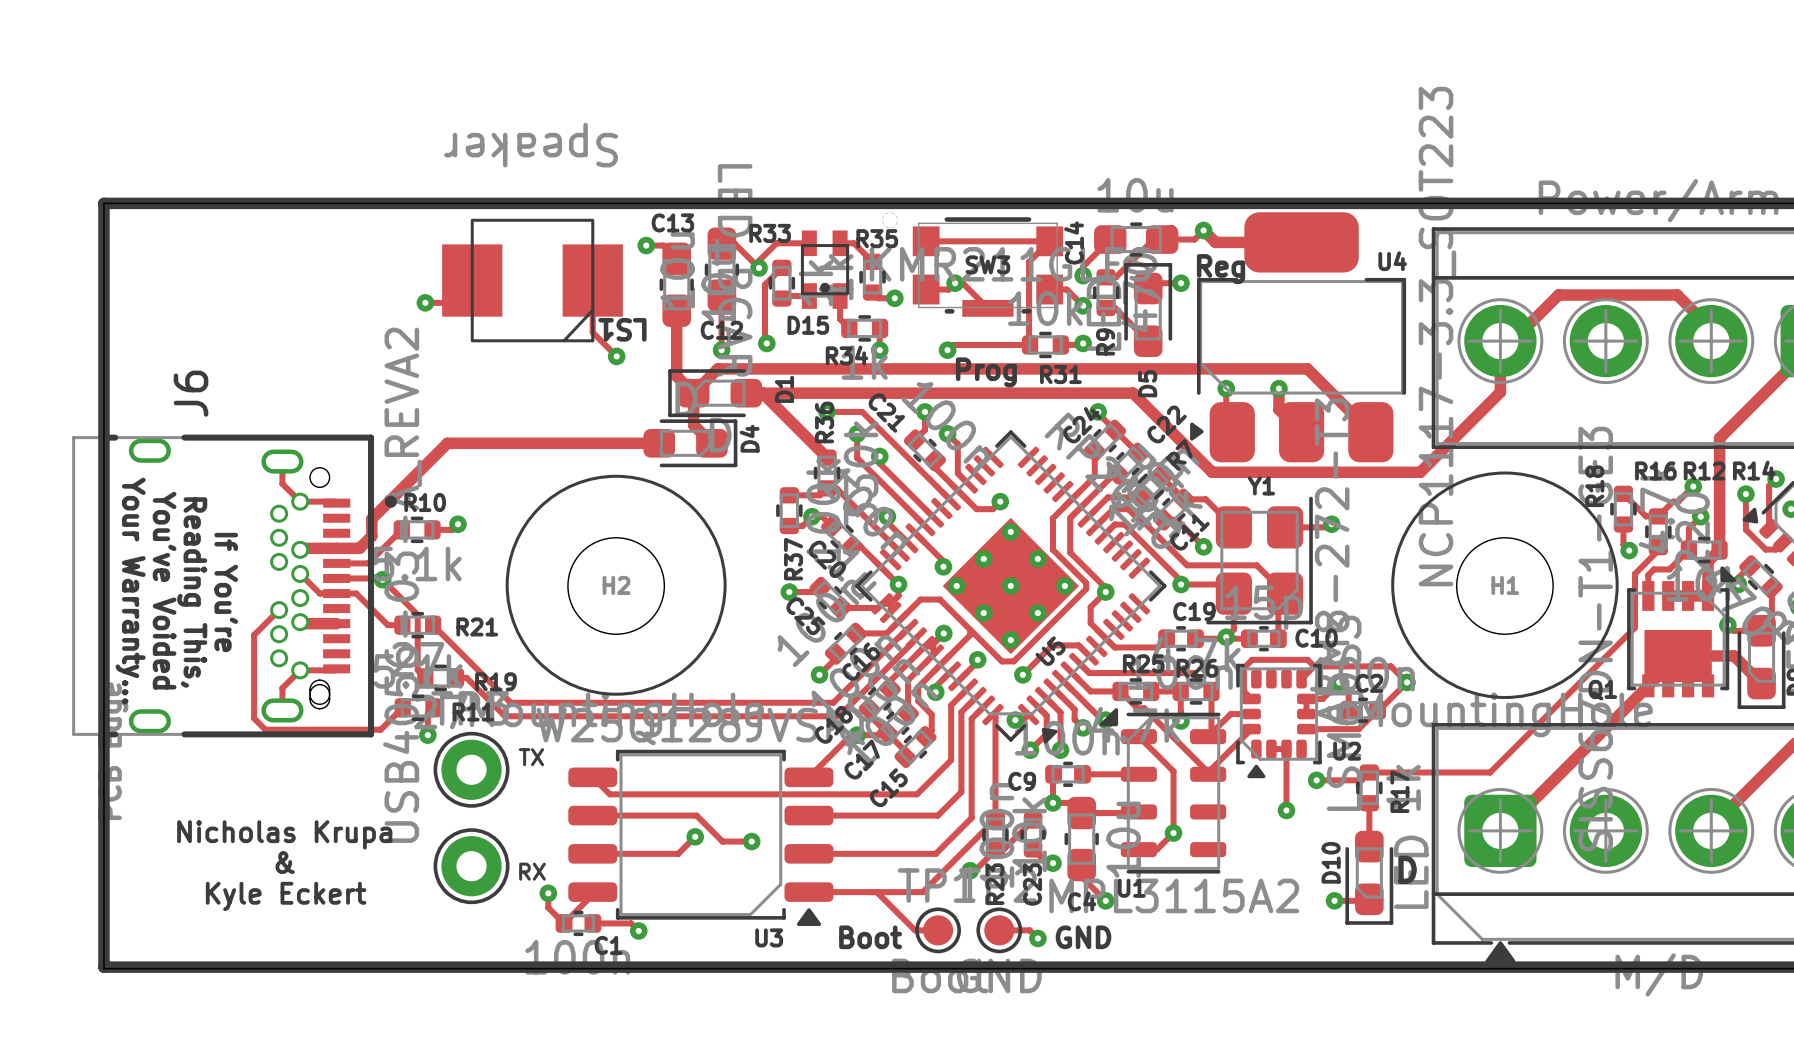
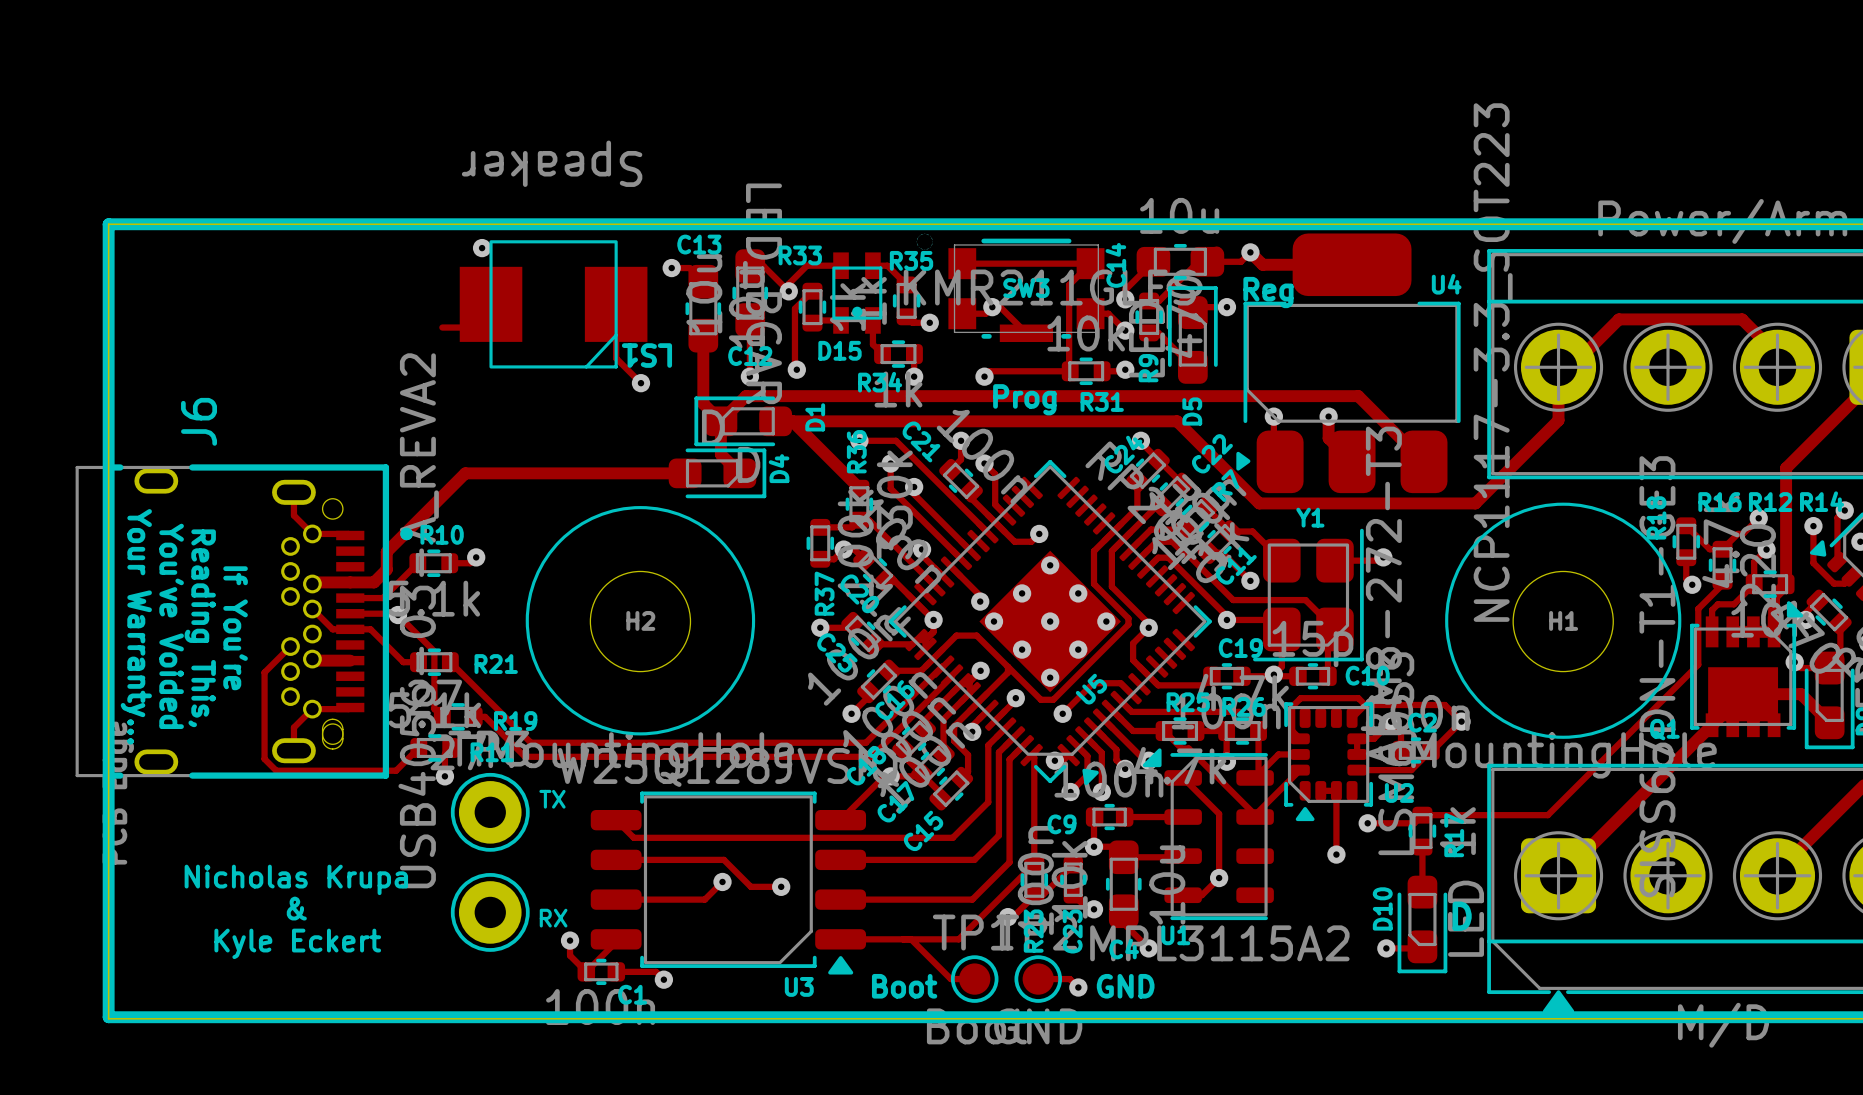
via position: (425, 302) -> (482, 248)

